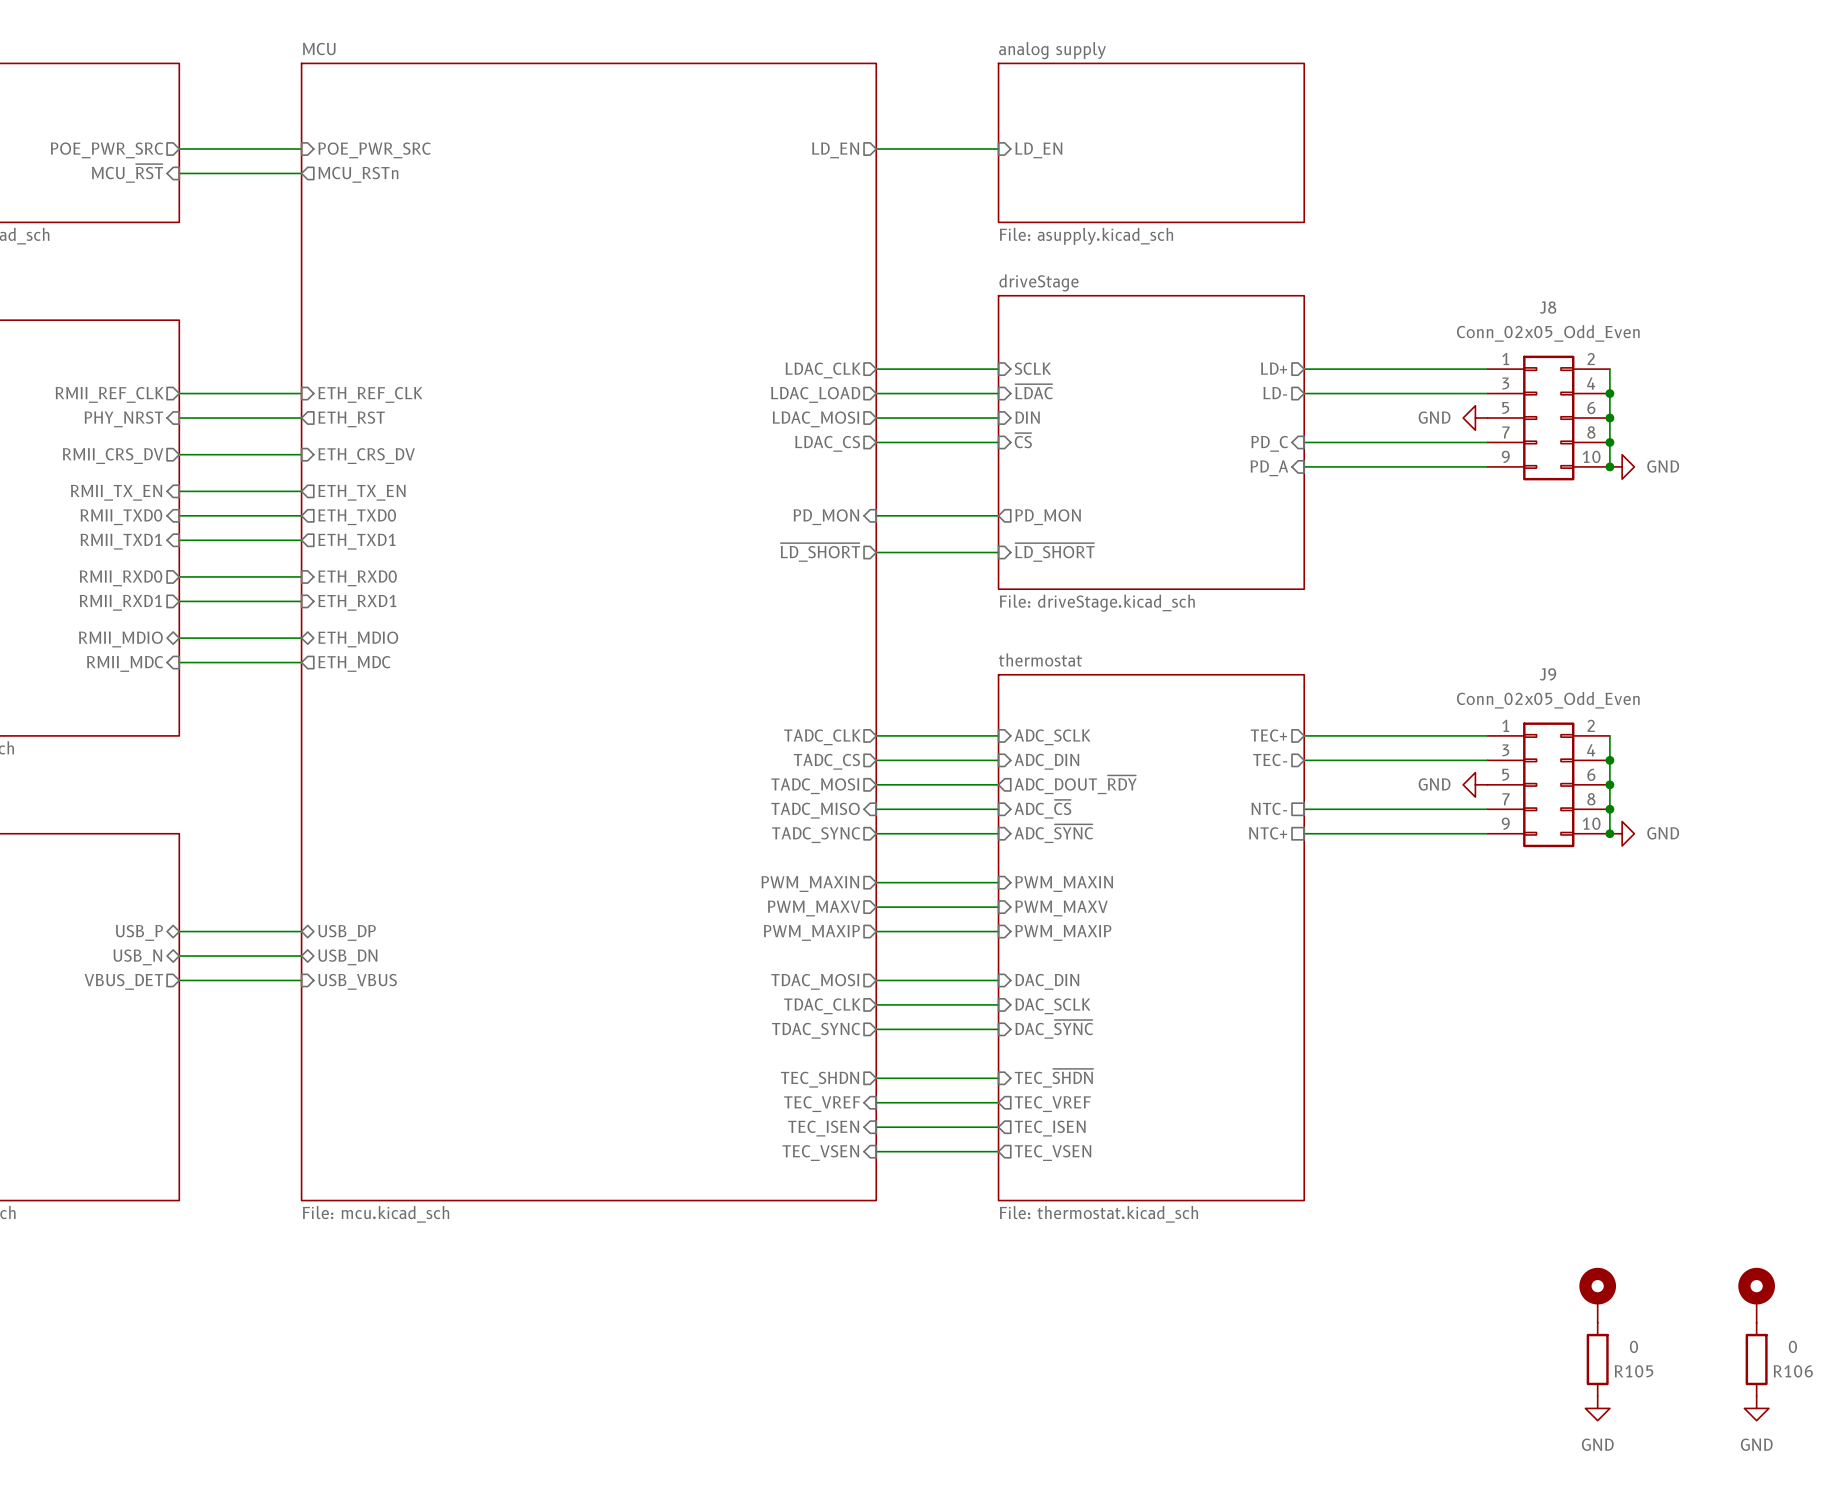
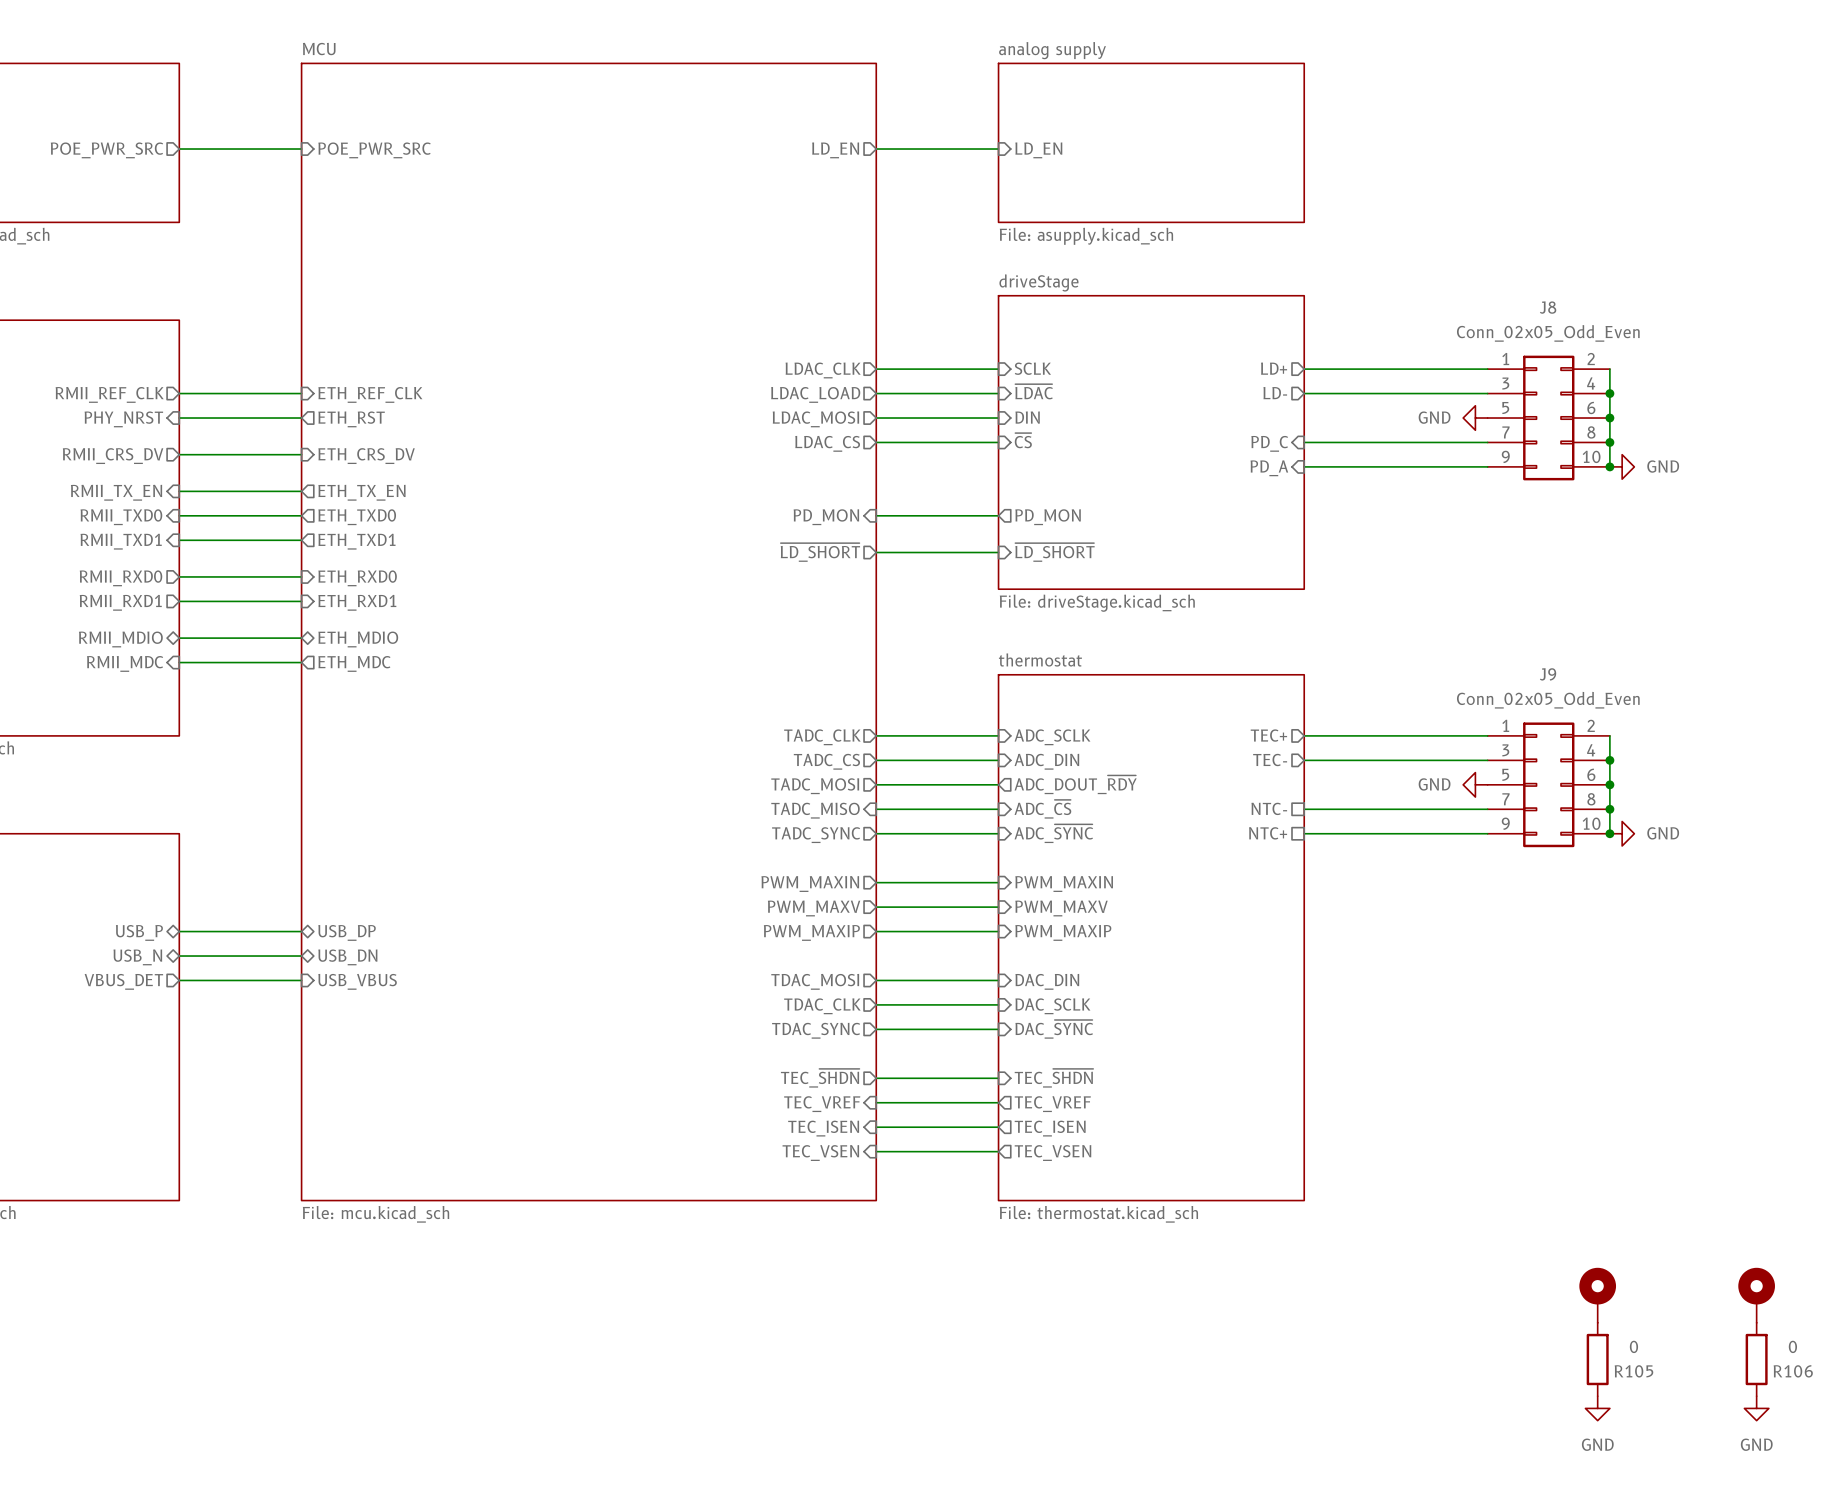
sheet pin: MCU_~{RST} (127, 173) -> none
wire: (179, 173) (301, 173) -> none
sheet pin: MCU_RSTn (358, 174) -> none
sheet pin: TEC_SHDN (820, 1079) -> TEC_~{SHDN} (820, 1078)

